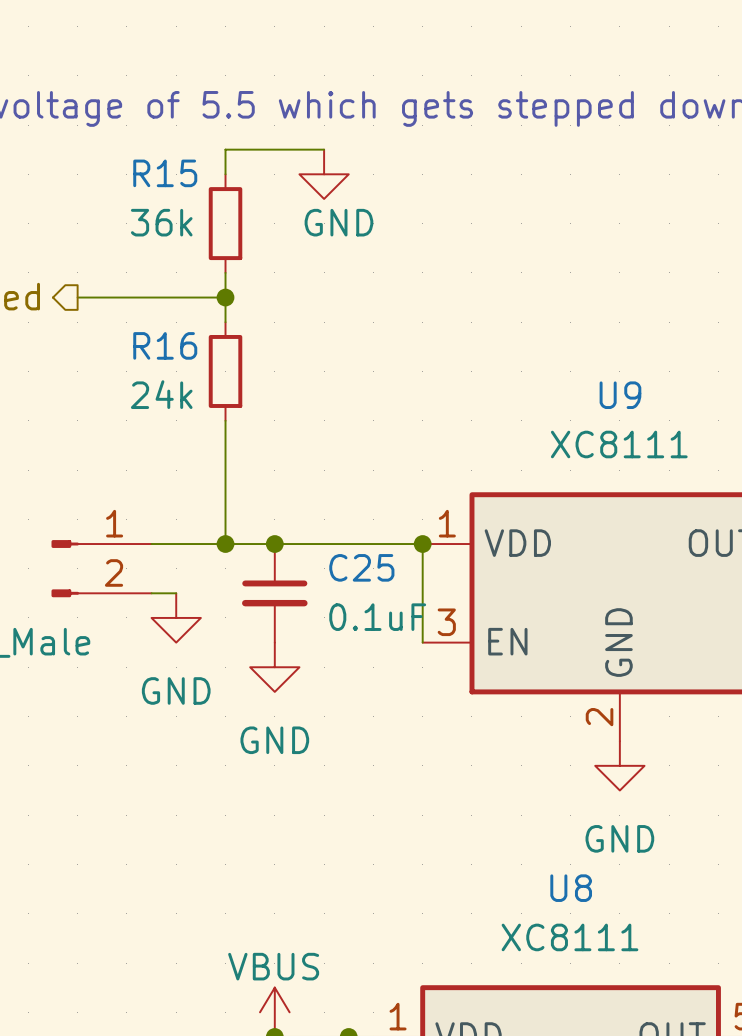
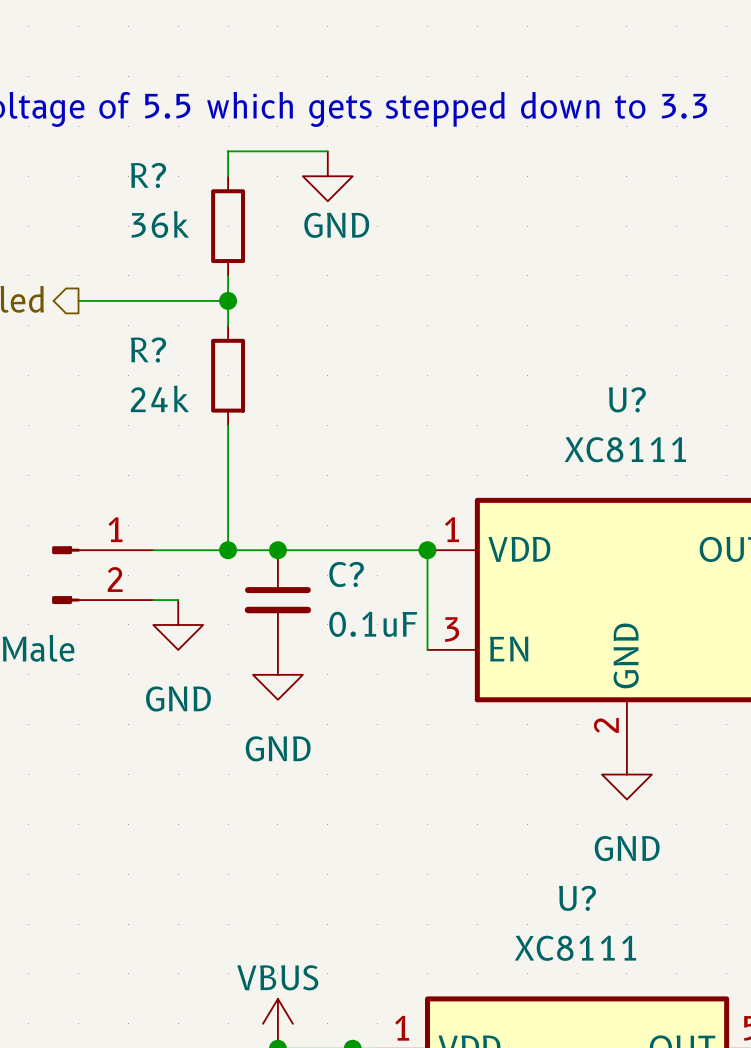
R15 name: R15 (165, 173) -> R? (148, 175)
R16 name: R16 (165, 345) -> R? (148, 349)
U9 name: U9 (620, 395) -> U? (627, 399)
C25 name: C25 (361, 567) -> C? (346, 574)
U8 name: U8 (571, 888) -> U? (577, 898)

